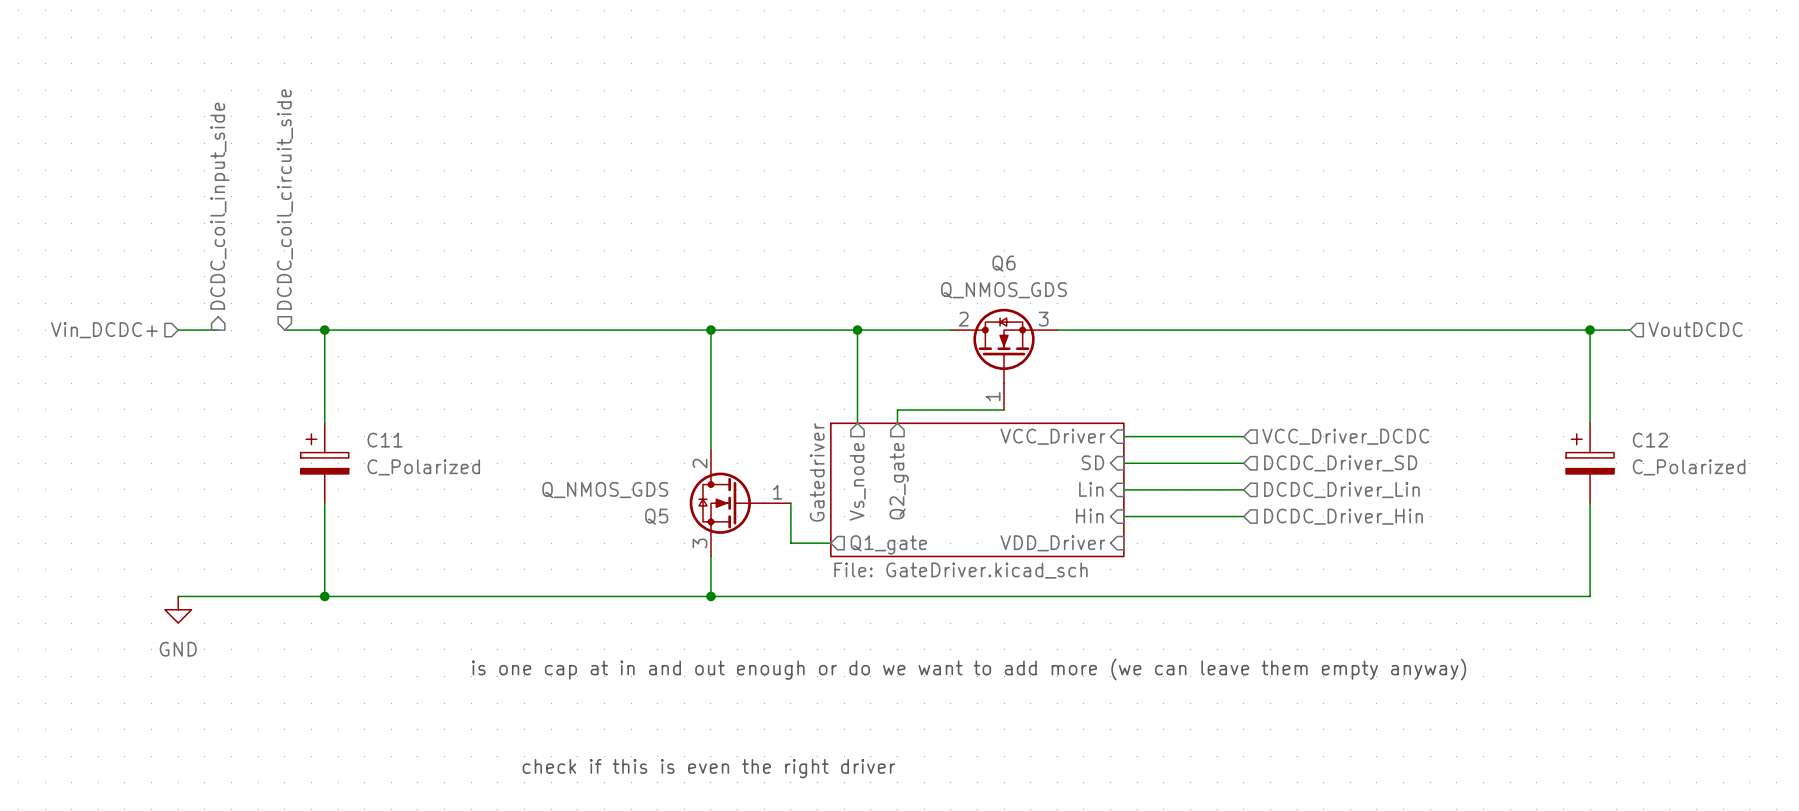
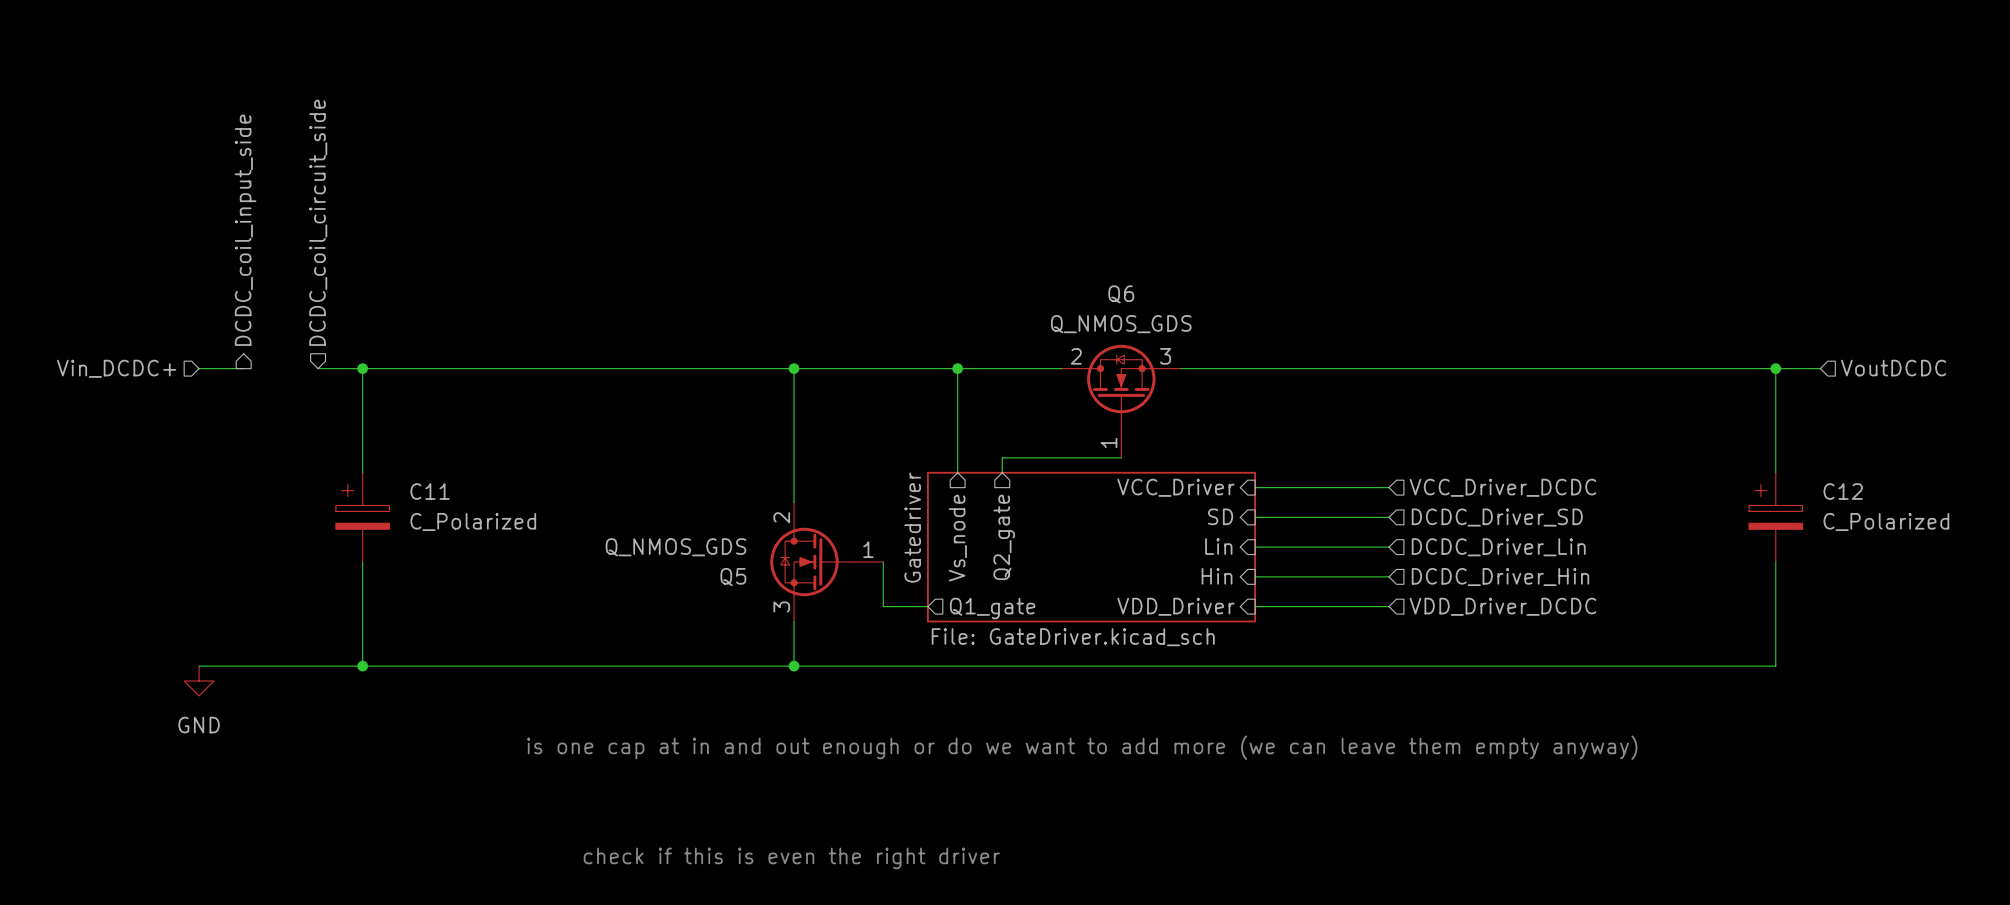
wire: none -> (1255, 606) (1389, 606)
hierarchical label: none -> VDD_Driver_DCDC (1502, 606)

